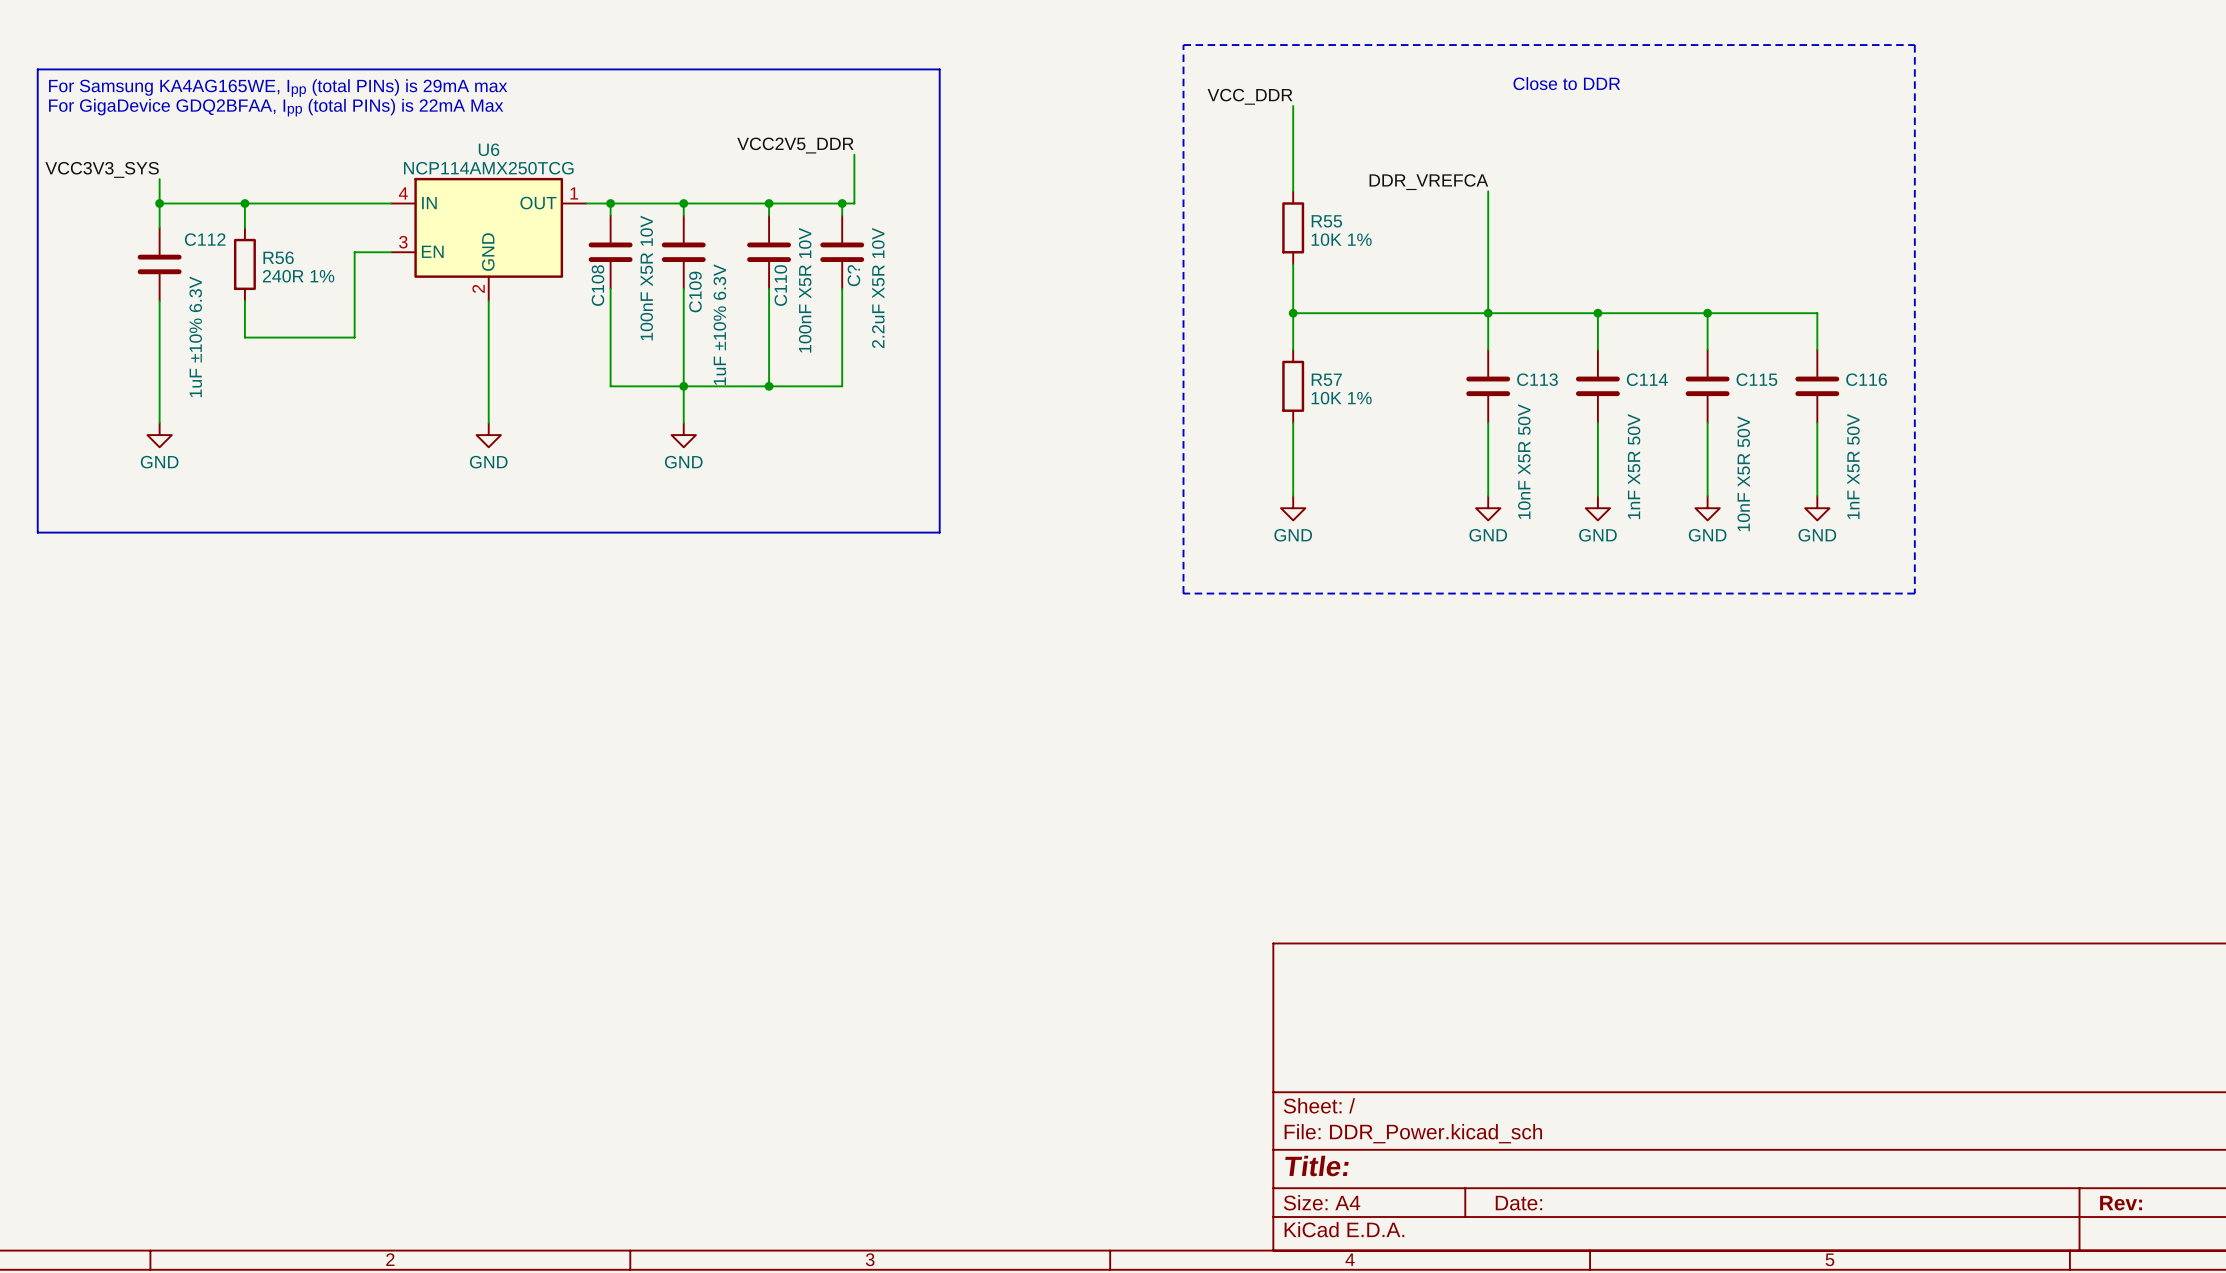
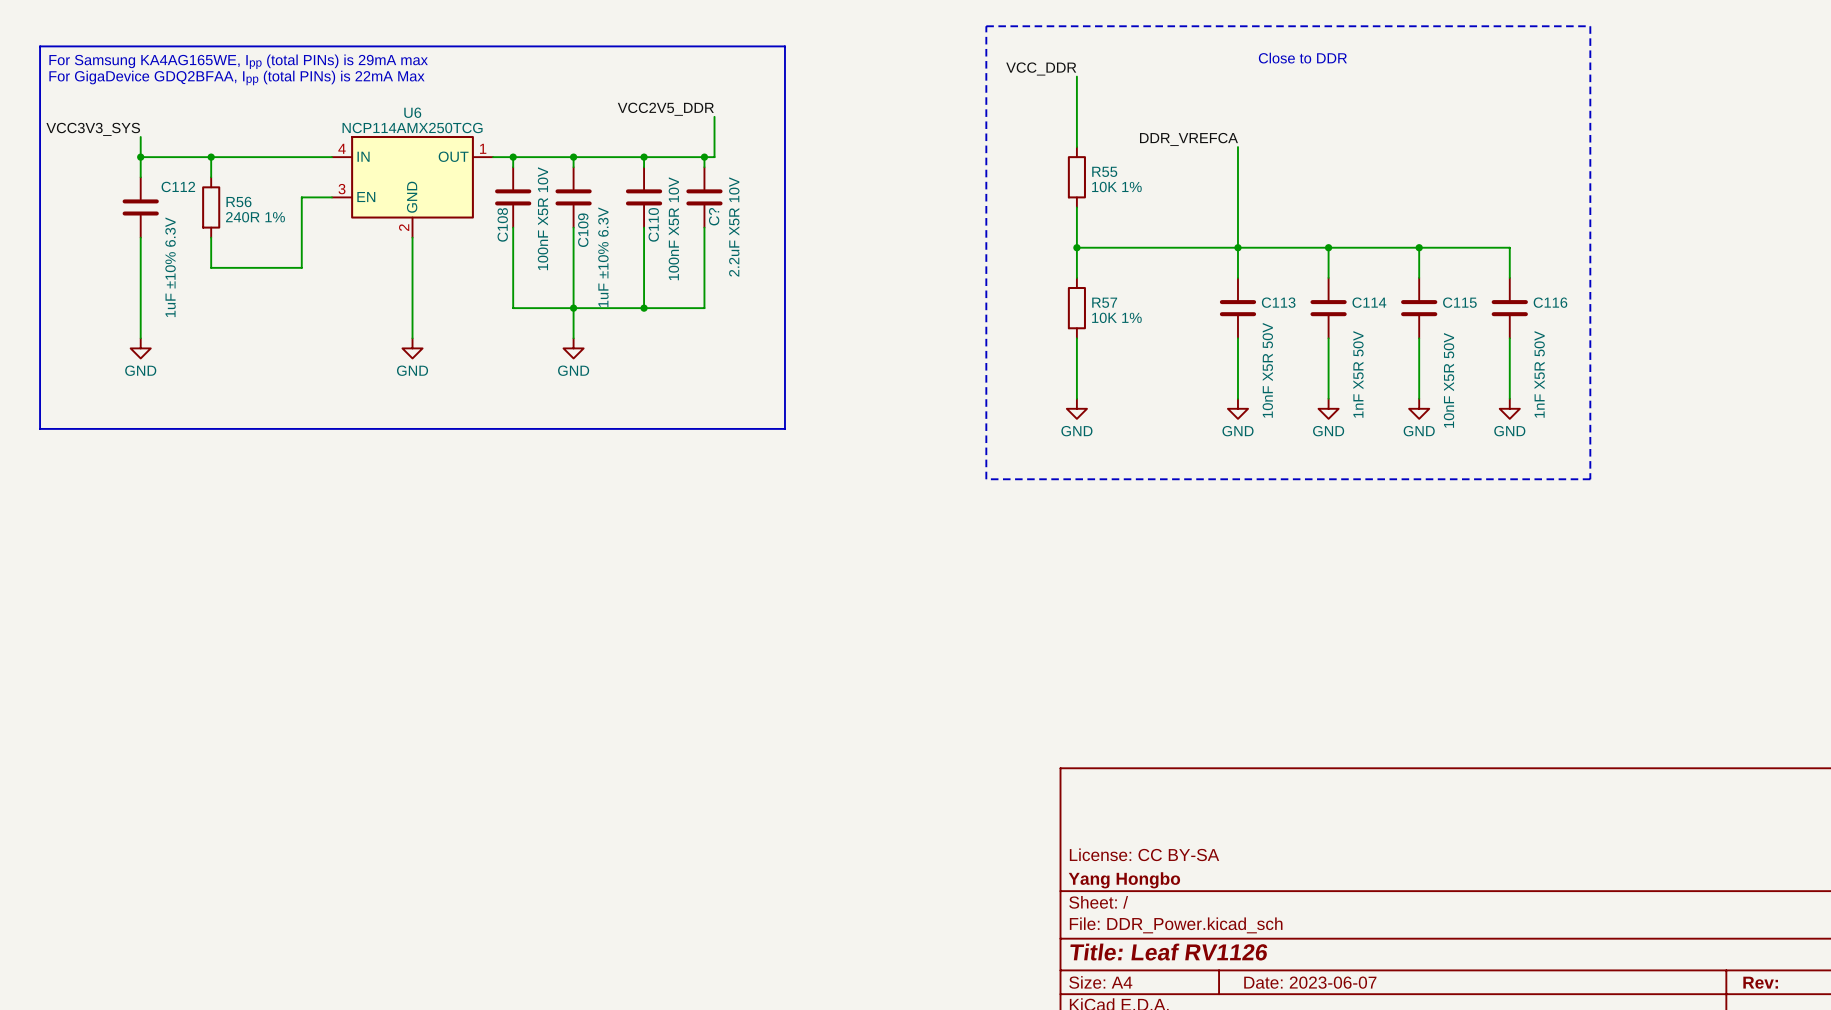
title block: none -> License: CC BY-SA (1144, 854)
title block: none -> Yang Hongbo (1124, 880)
title block: Title: (1316, 1166) -> Title: Leaf RV1126 (1168, 952)
title block: Date: (1518, 1203) -> Date: 2023-06-07 (1310, 982)

